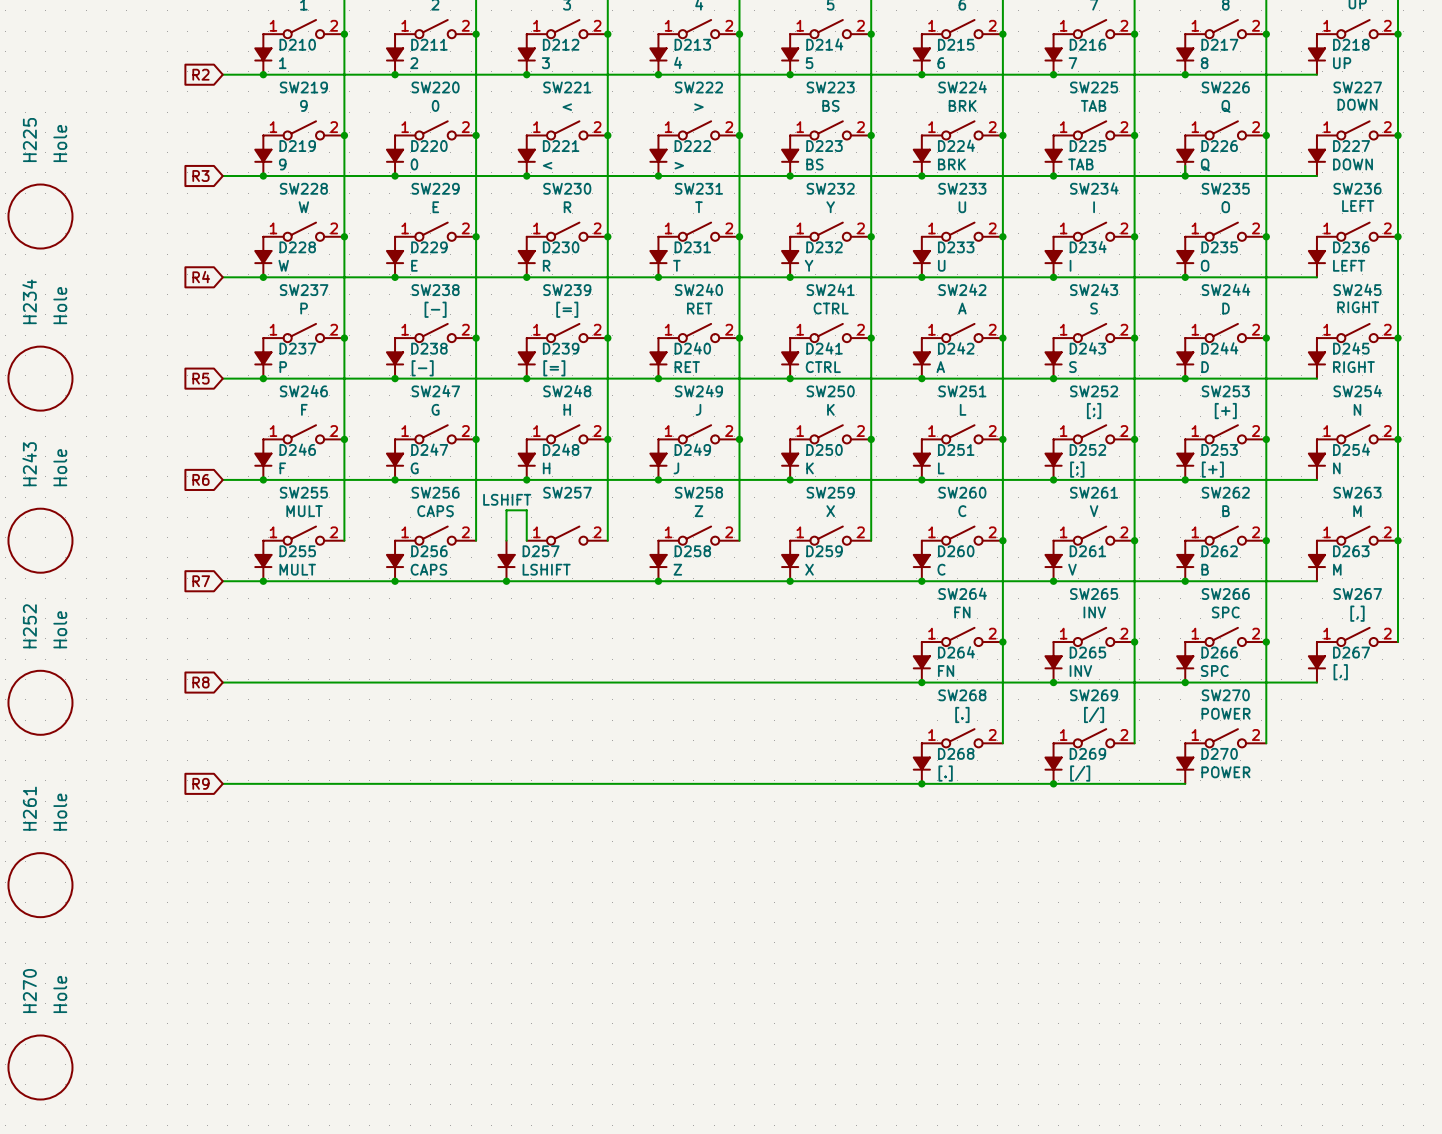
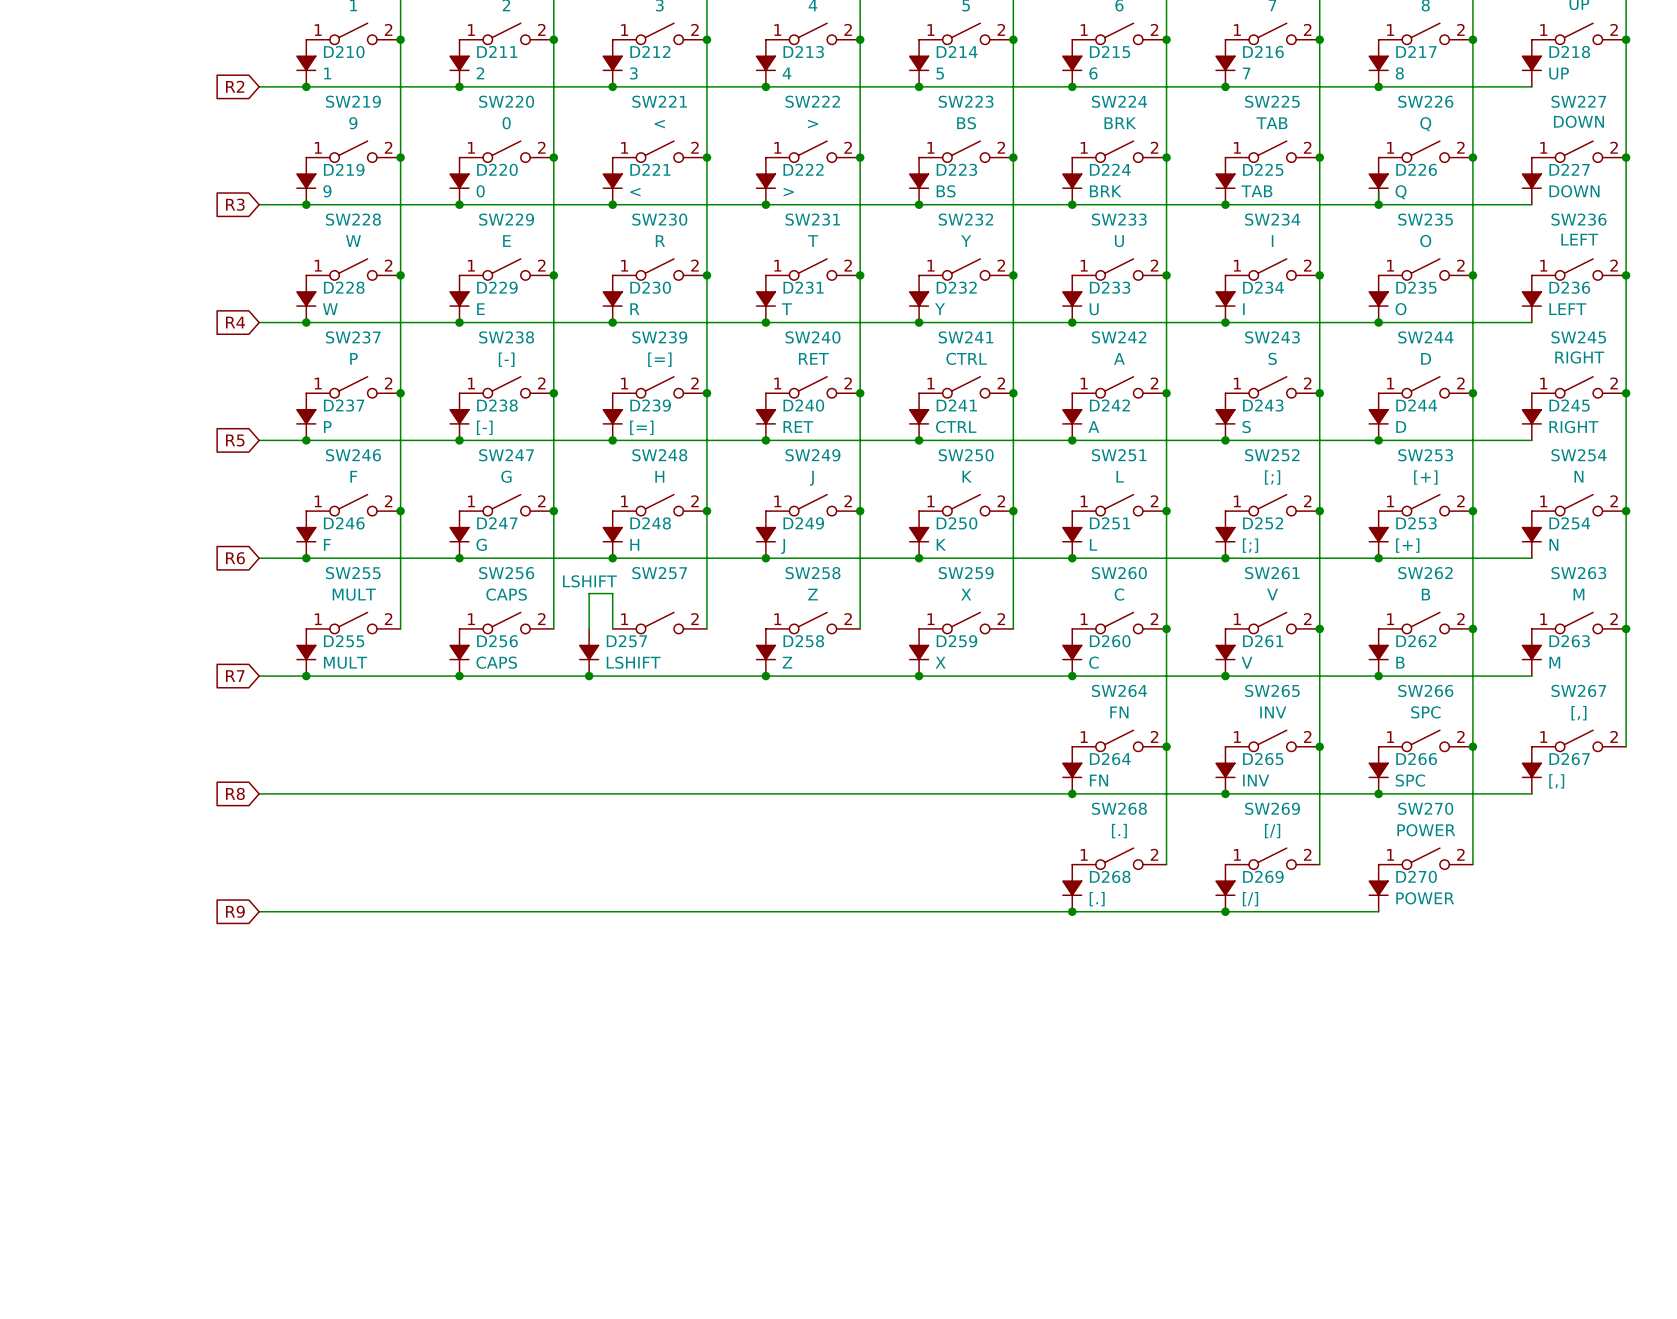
H225: Hole (40, 216) -> none
H234: Hole (40, 378) -> none
H243: Hole (40, 540) -> none
H252: Hole (40, 702) -> none
H261: Hole (40, 885) -> none
H270: Hole (40, 1067) -> none

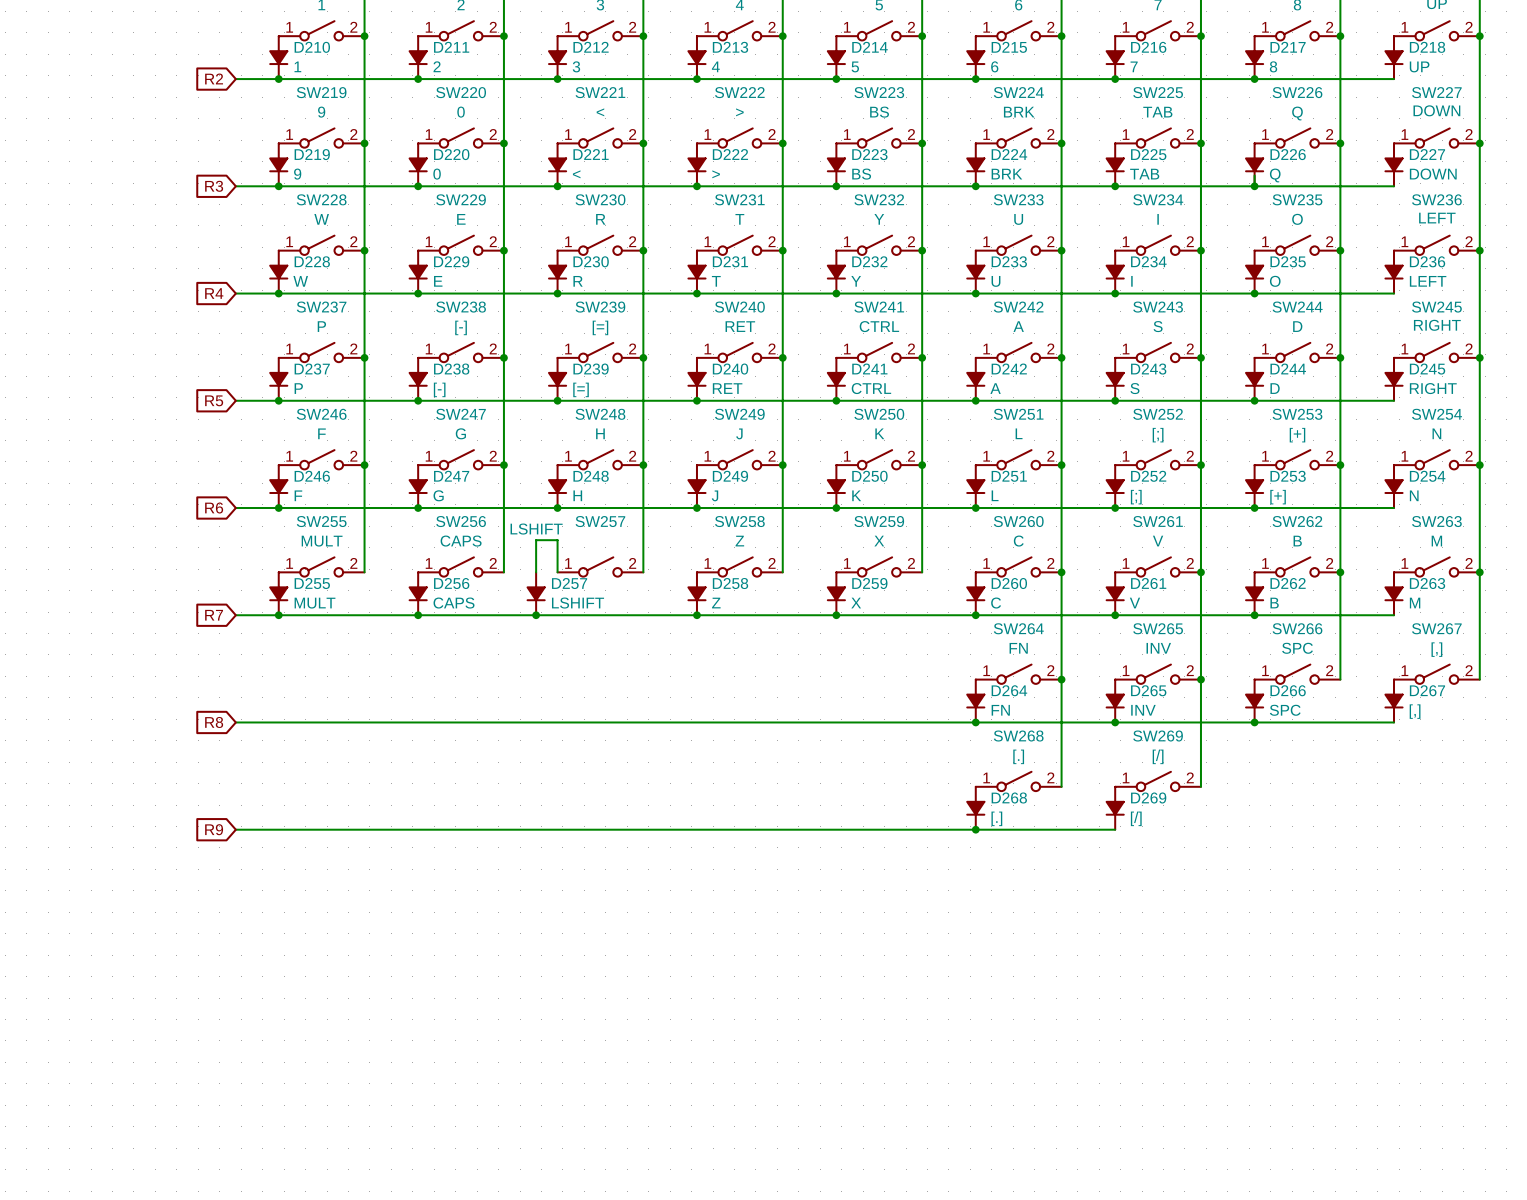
wire: (1472, 746) (1472, 864) -> none
junction: (1472, 746) -> none
SW270: POWER (1425, 858) -> none
D270: POWER (1378, 888) -> none
wire: (1225, 911) (1378, 911) -> none
junction: (1225, 911) -> none

